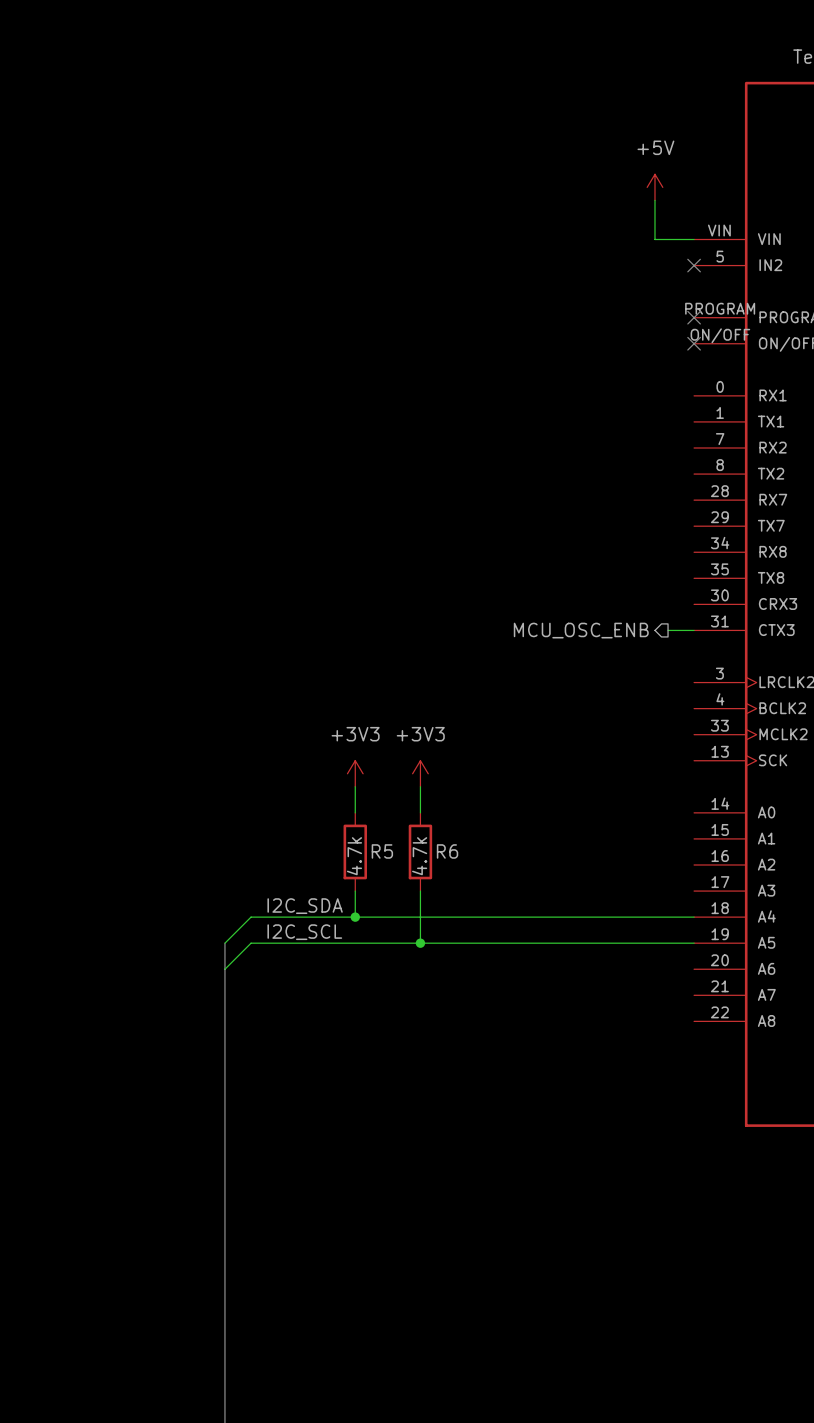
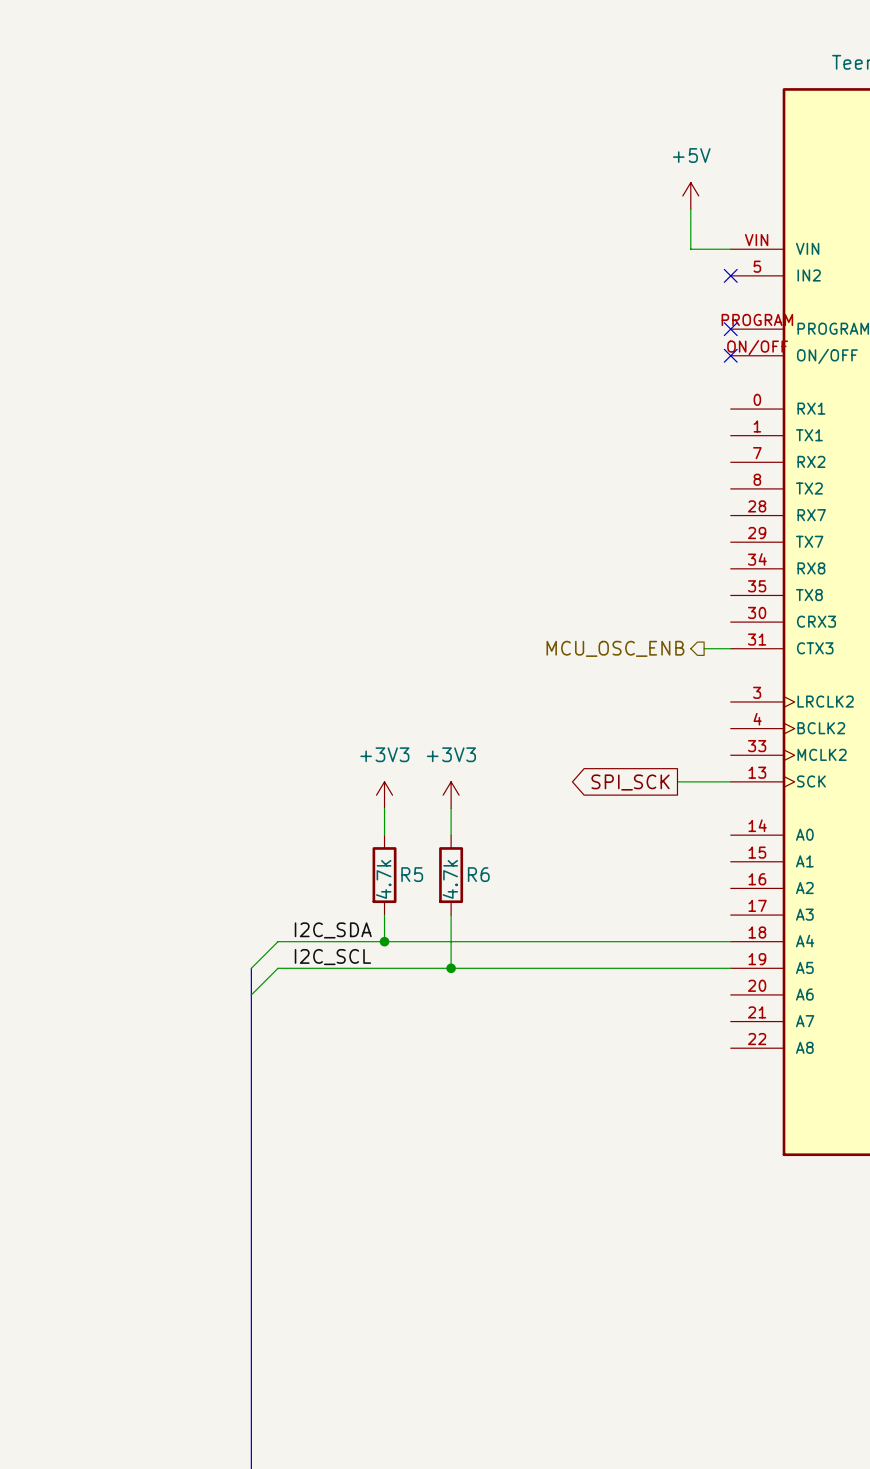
wire: none -> (677, 781) (730, 781)
global label: none -> SPI_SCK (630, 782)

